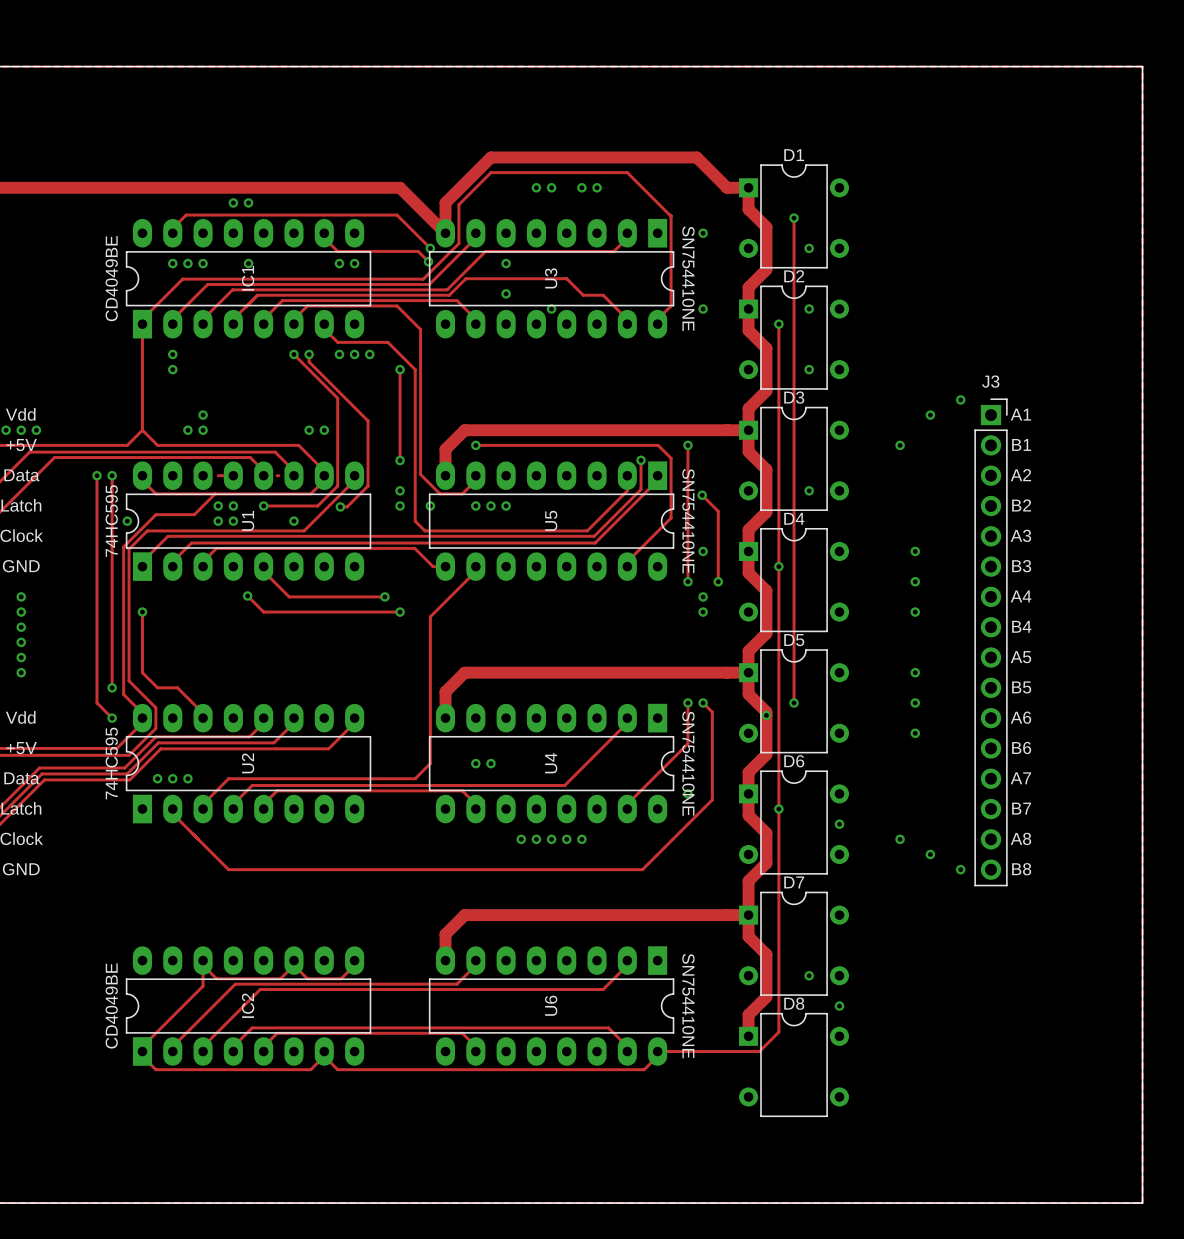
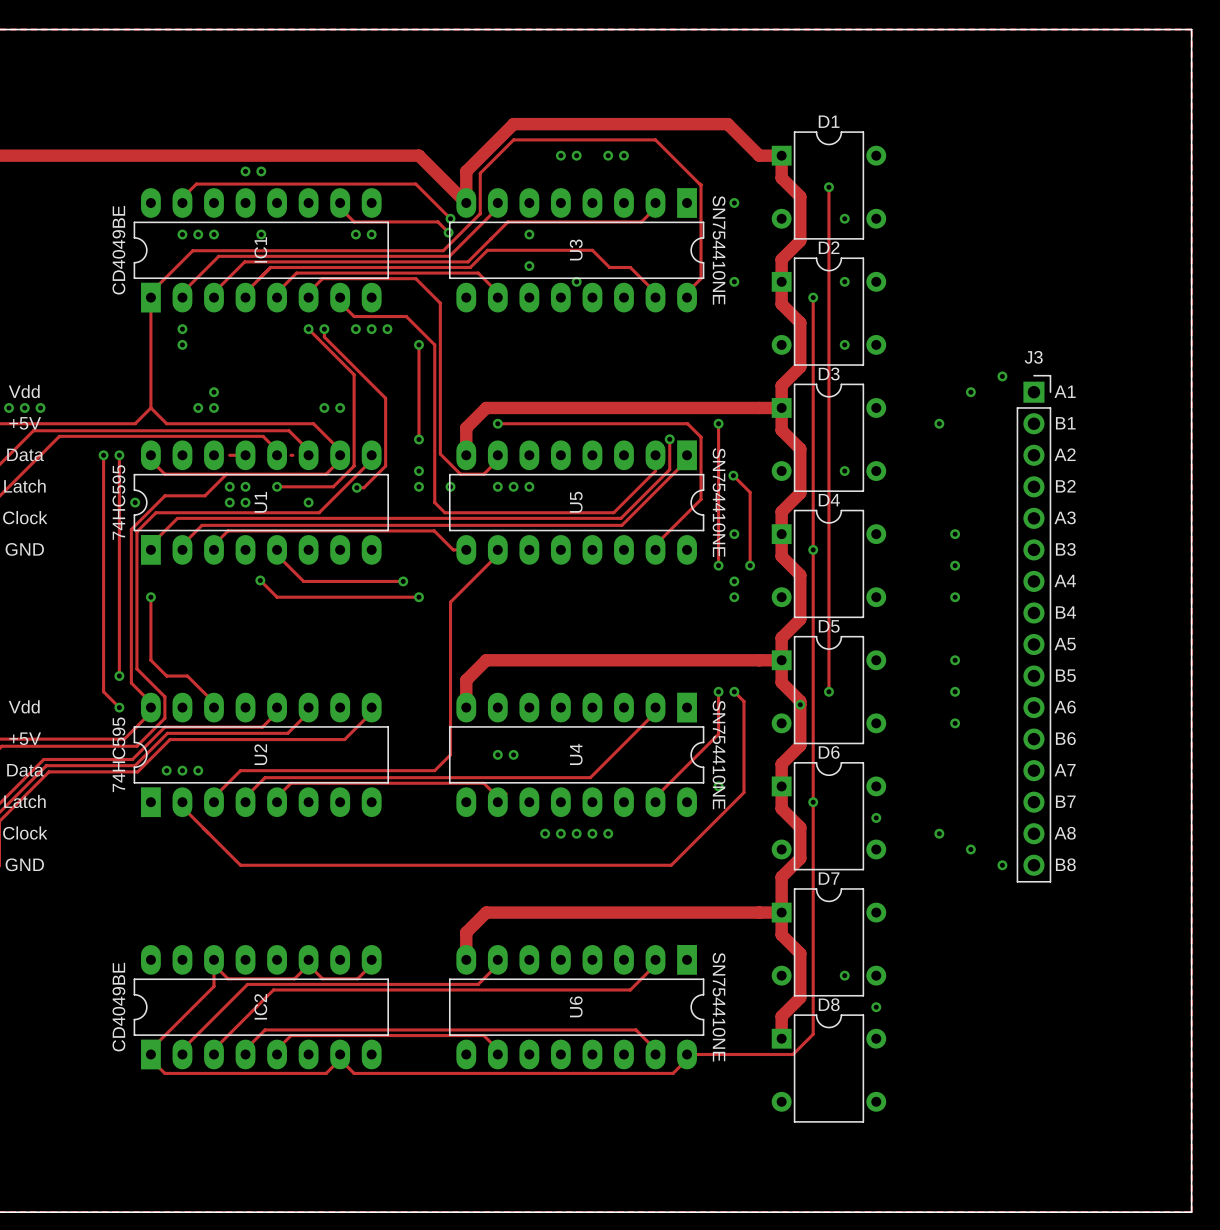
via: (21, 596) -> none
via: (21, 612) -> none
via: (21, 627) -> none
via: (21, 642) -> none
via: (21, 657) -> none
via: (21, 672) -> none

